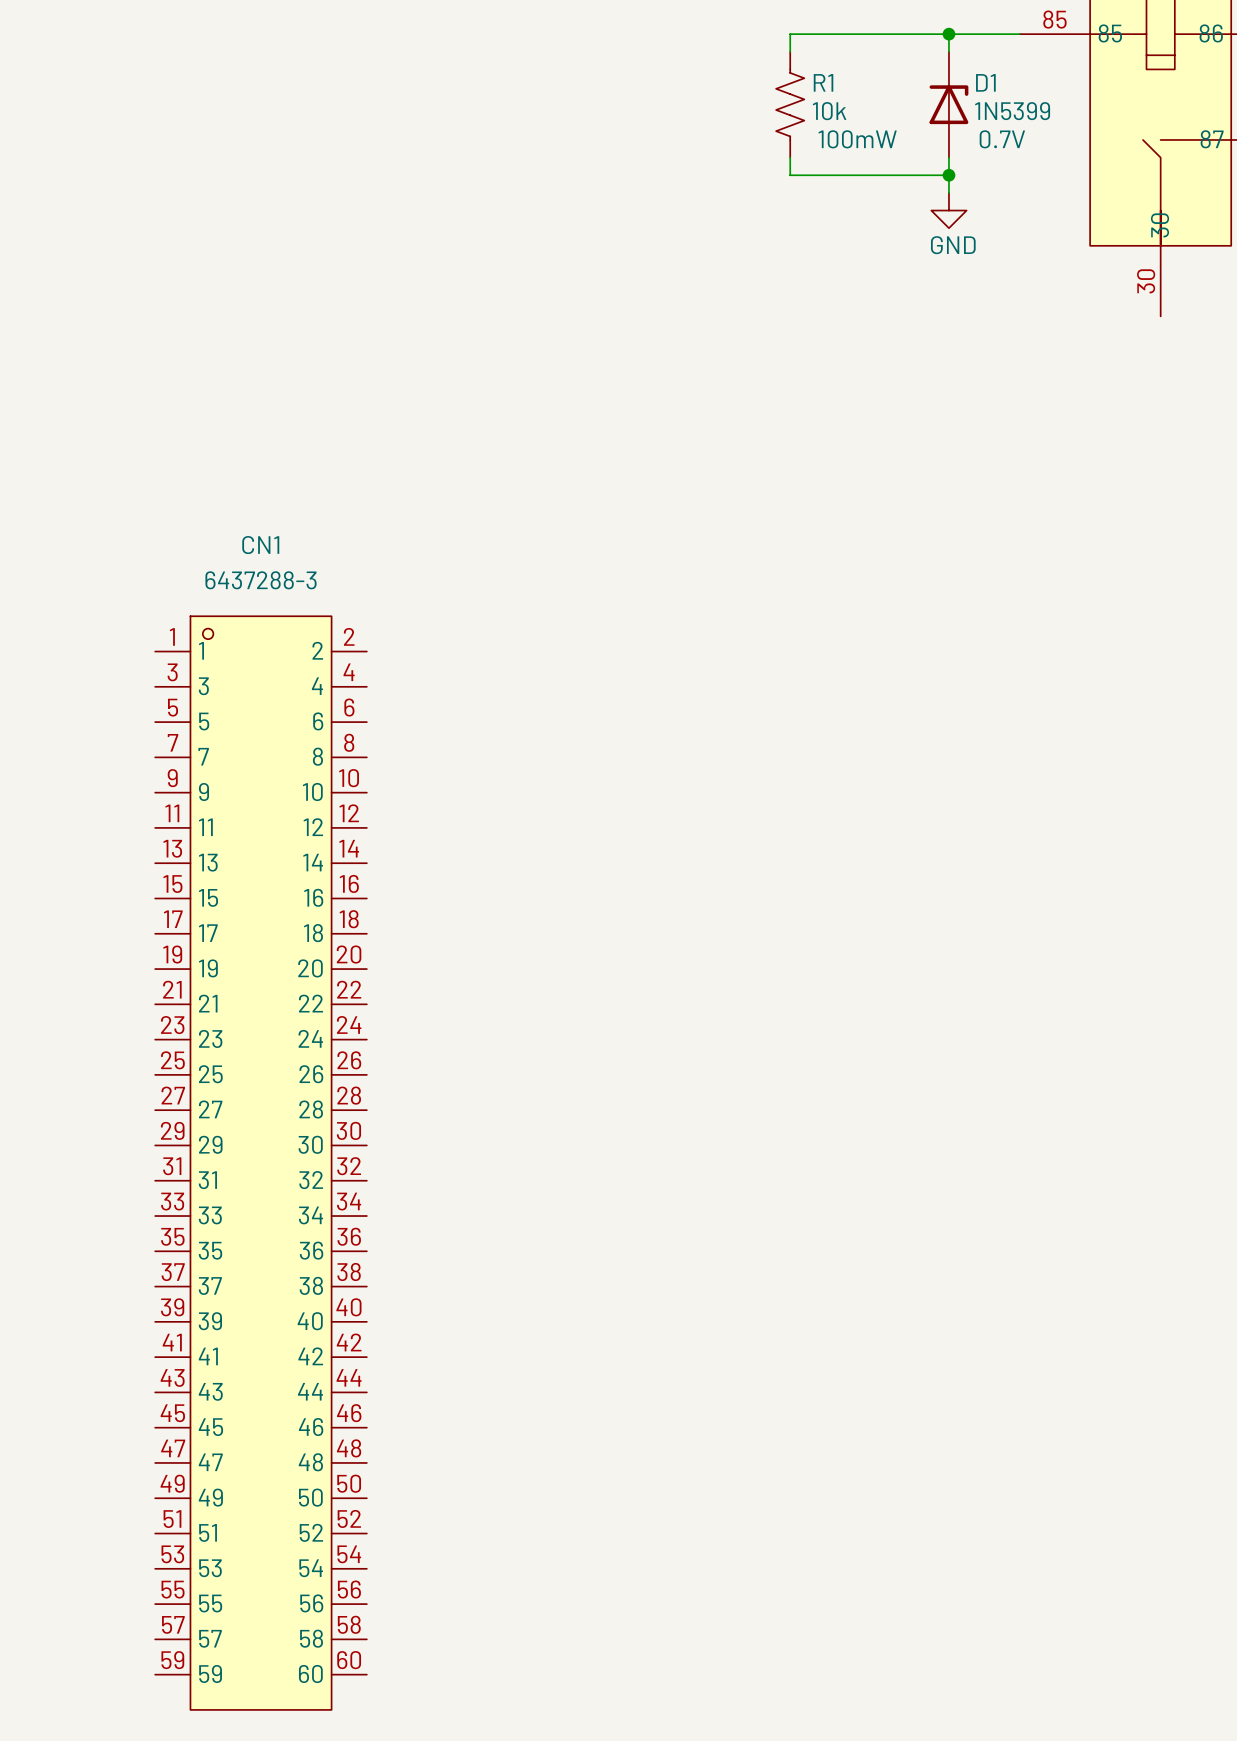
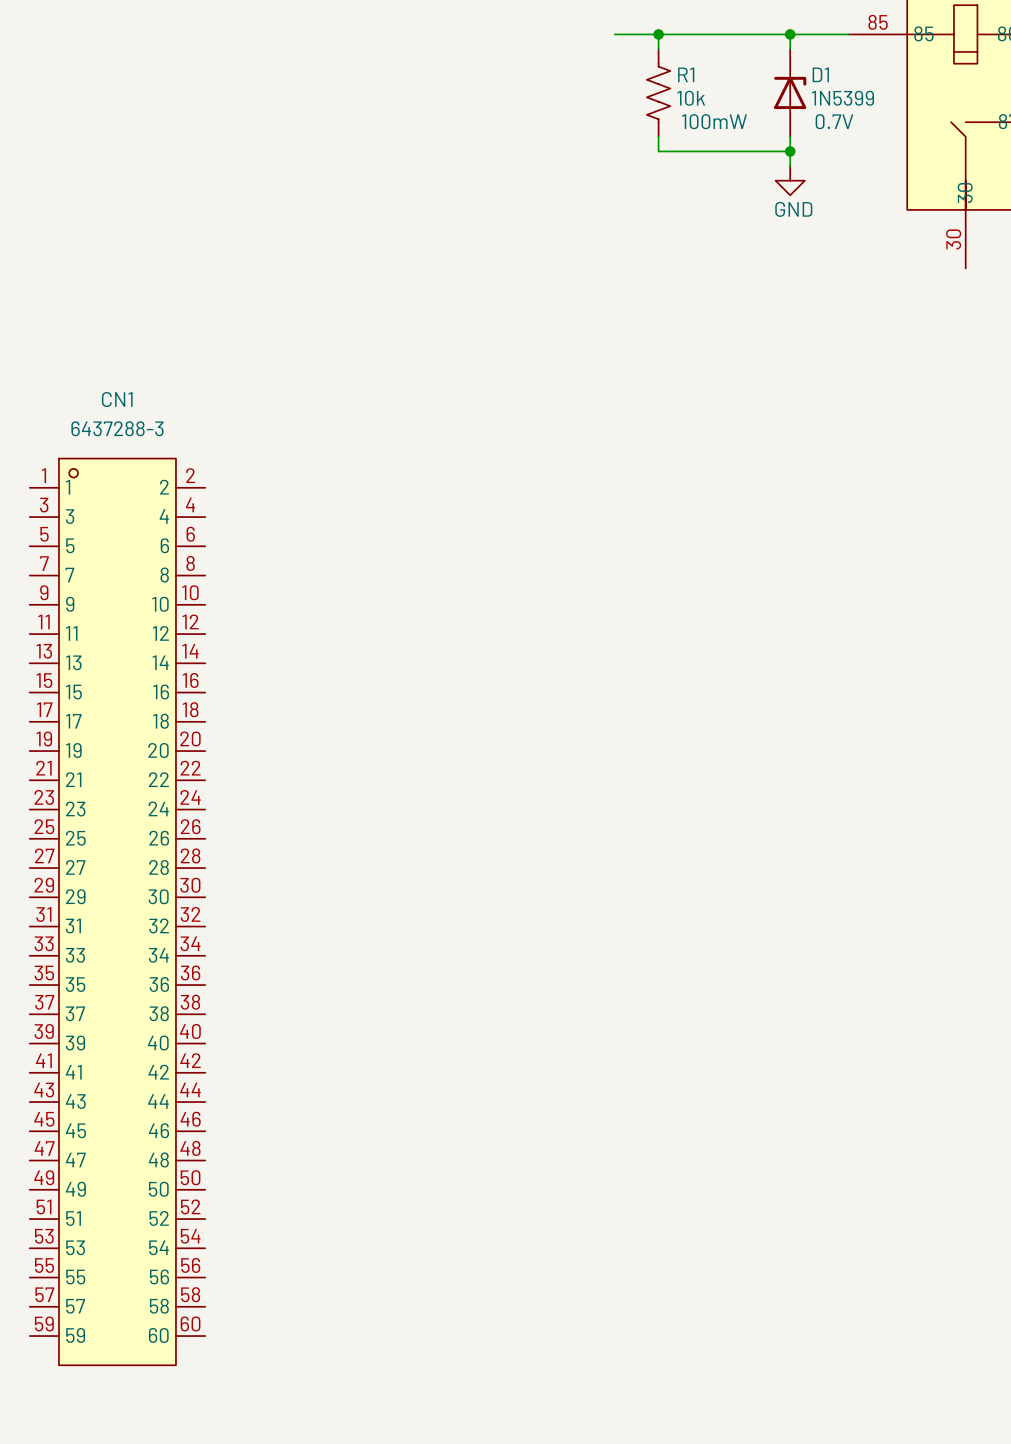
wire: none -> (614, 34) (658, 34)
junction: none -> (658, 34)
CN1 position: (261, 1163) -> (117, 911)

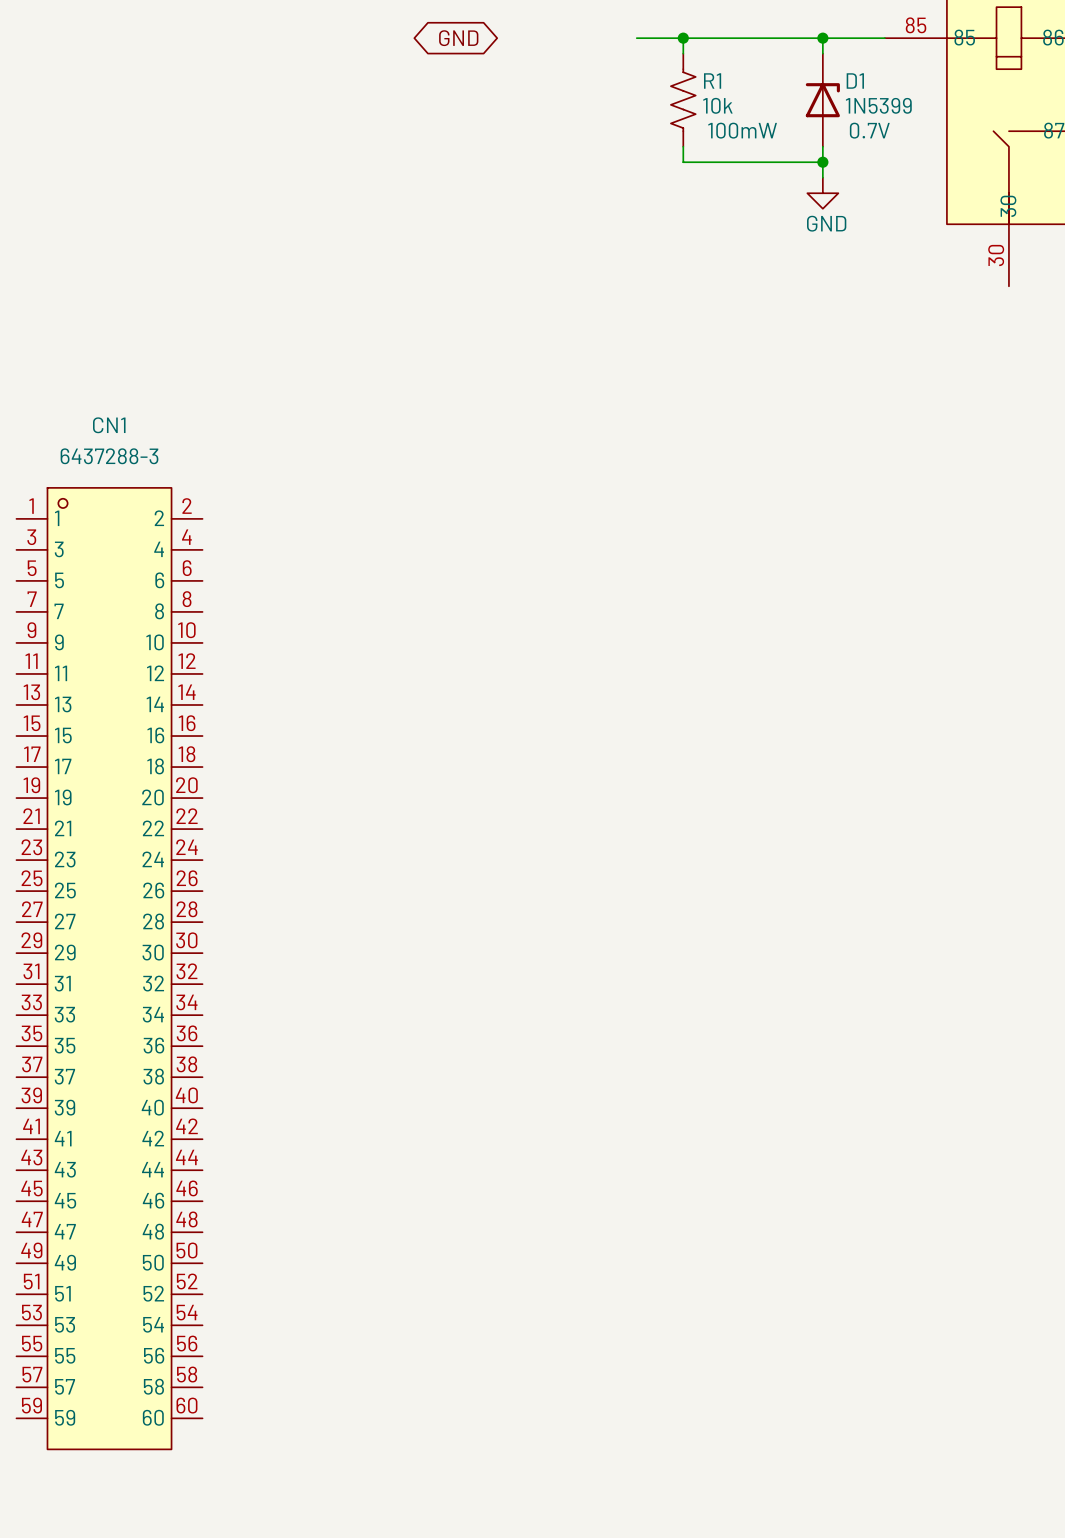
global label: none -> GND (458, 38)

